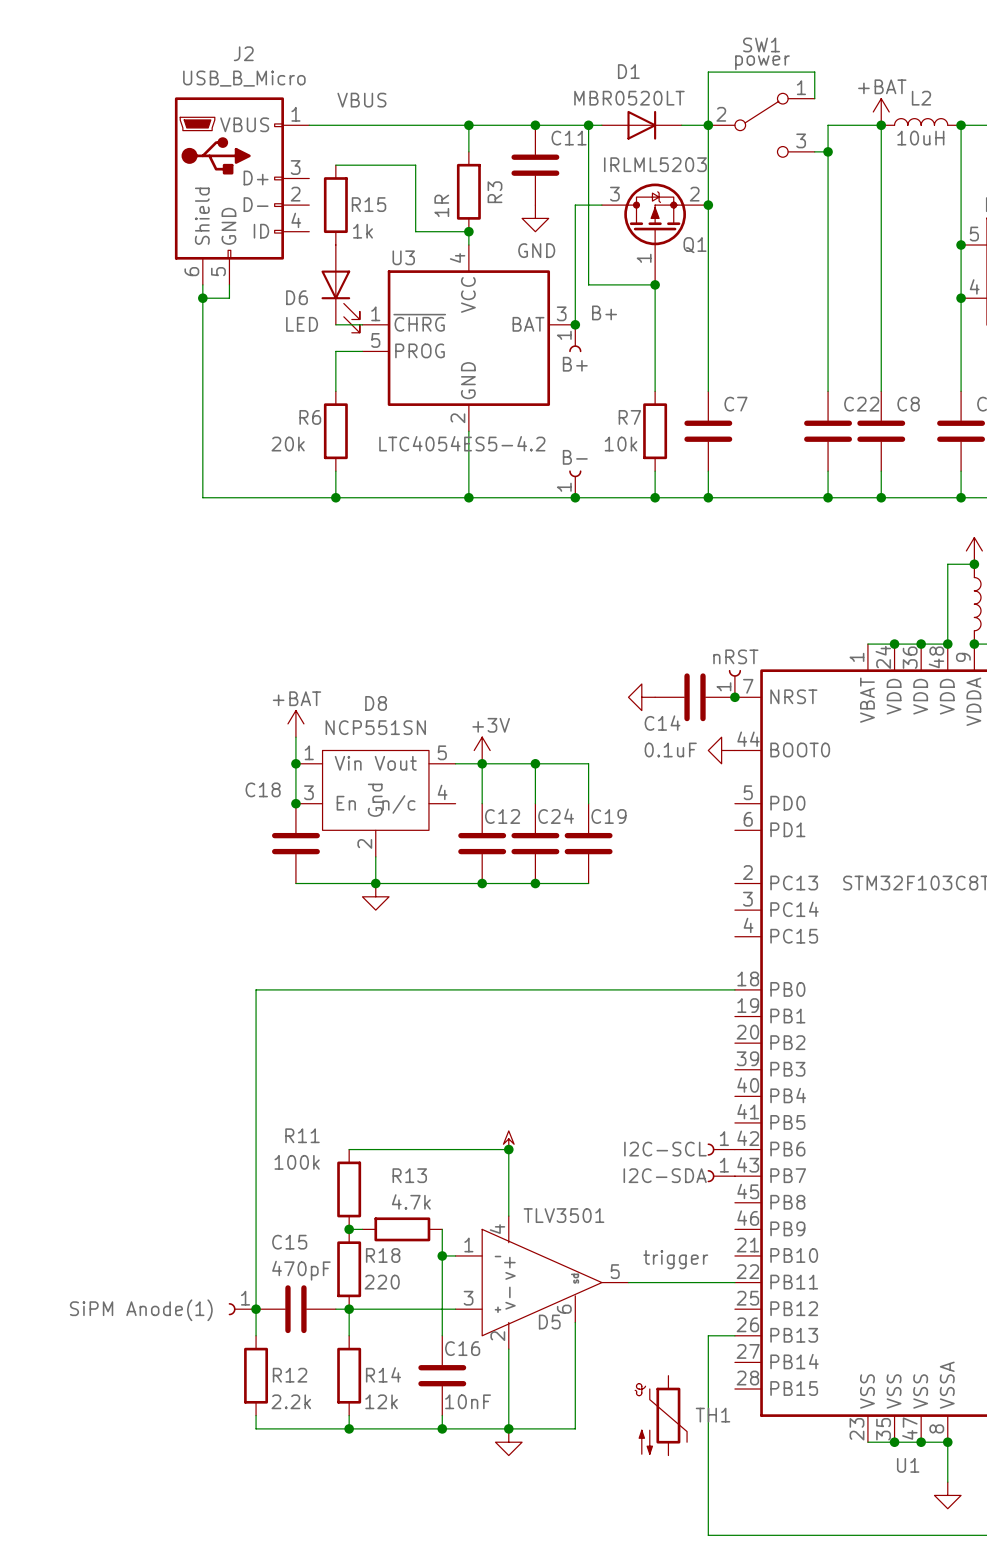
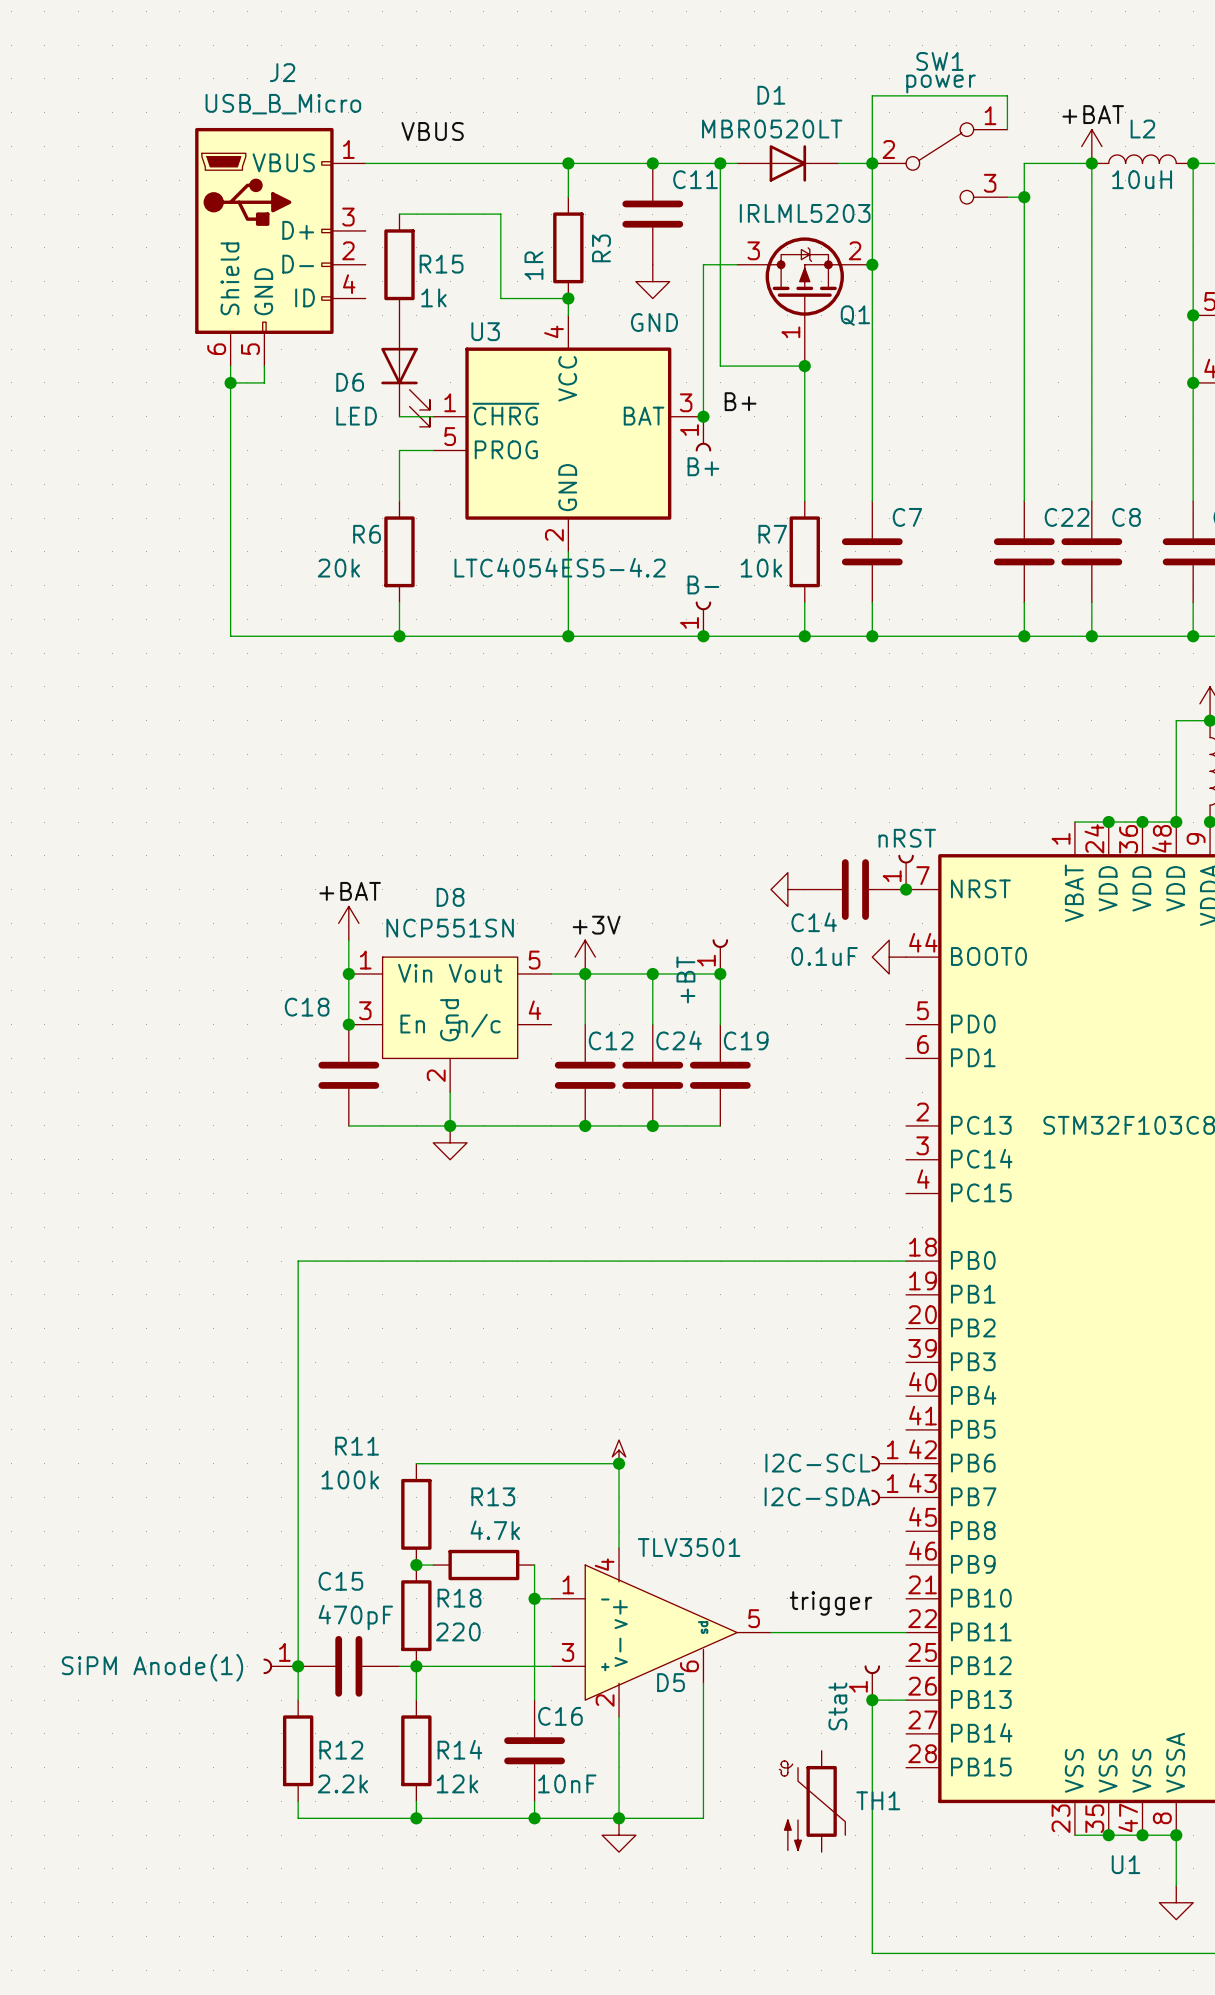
part: none -> +BT (720, 956)
junction: none -> (720, 973)
part: none -> Stat (872, 1682)
junction: none -> (872, 1700)

